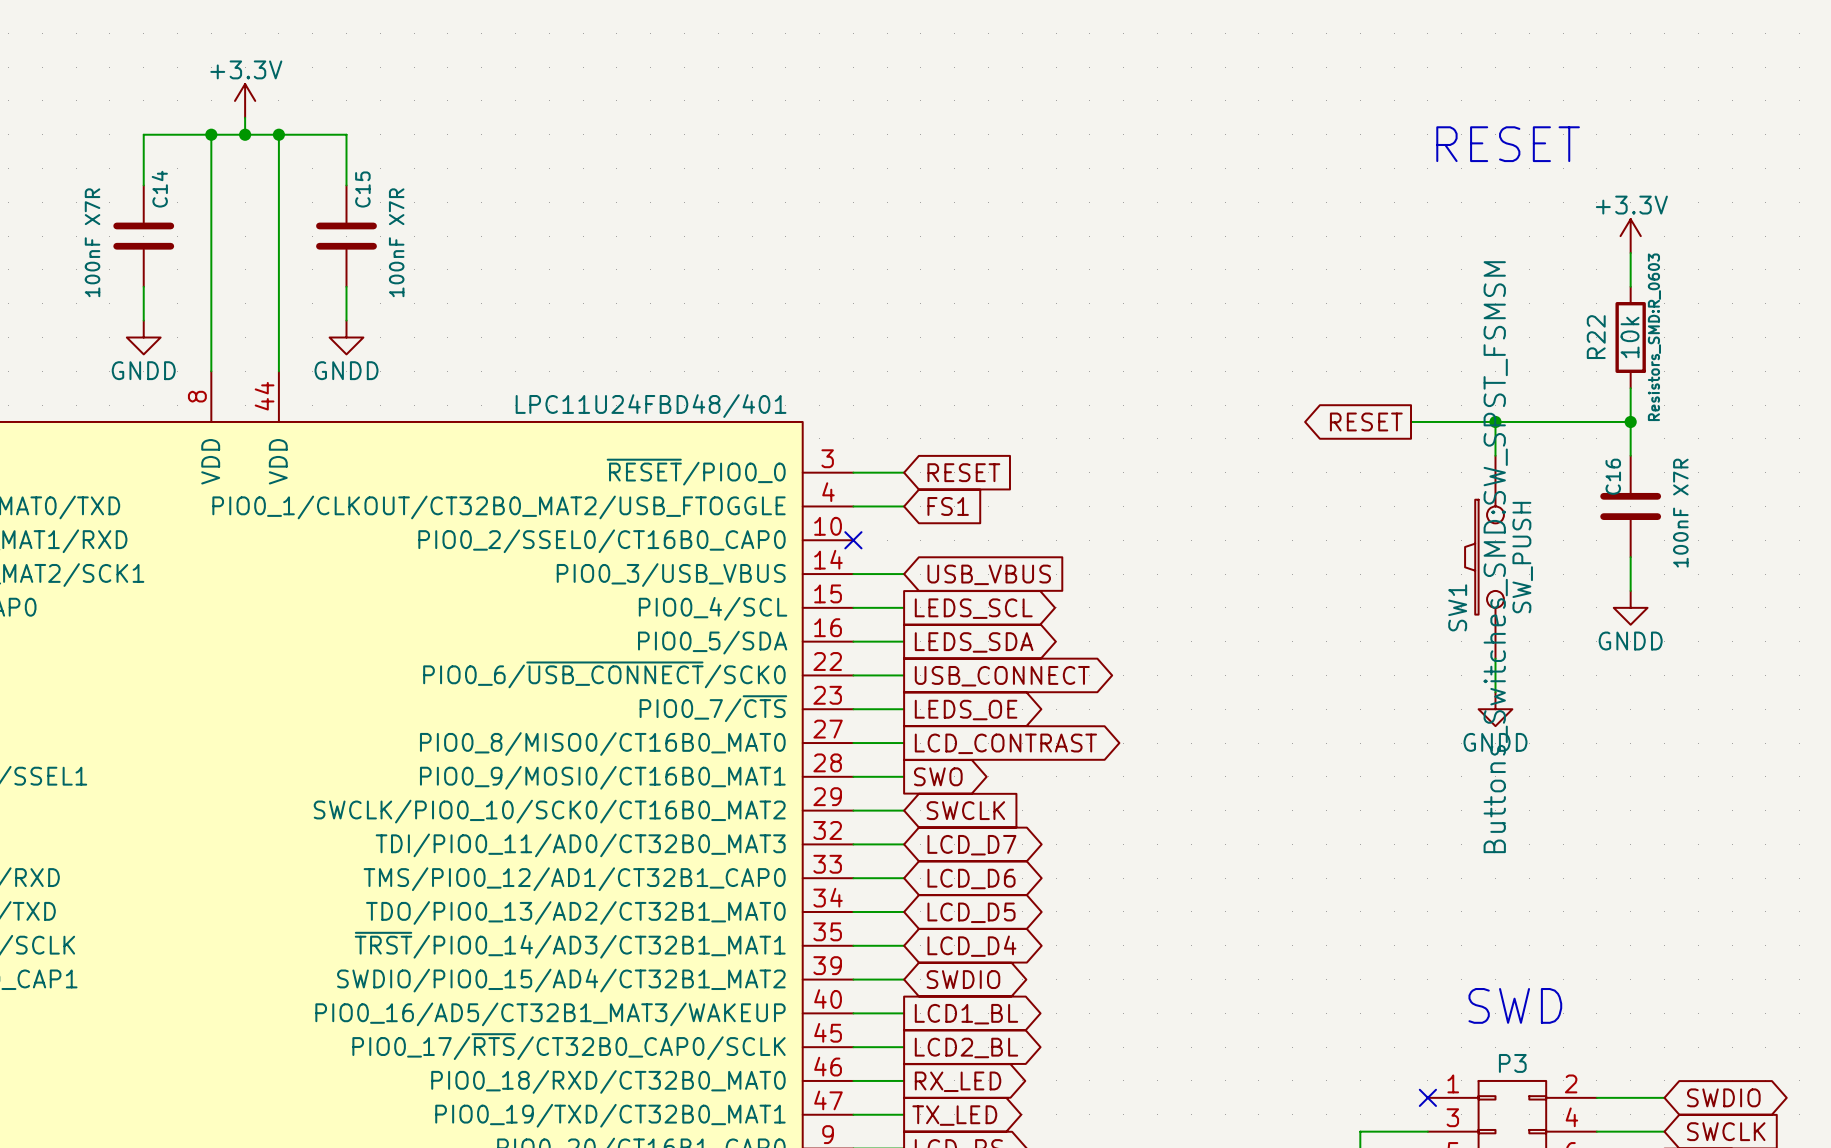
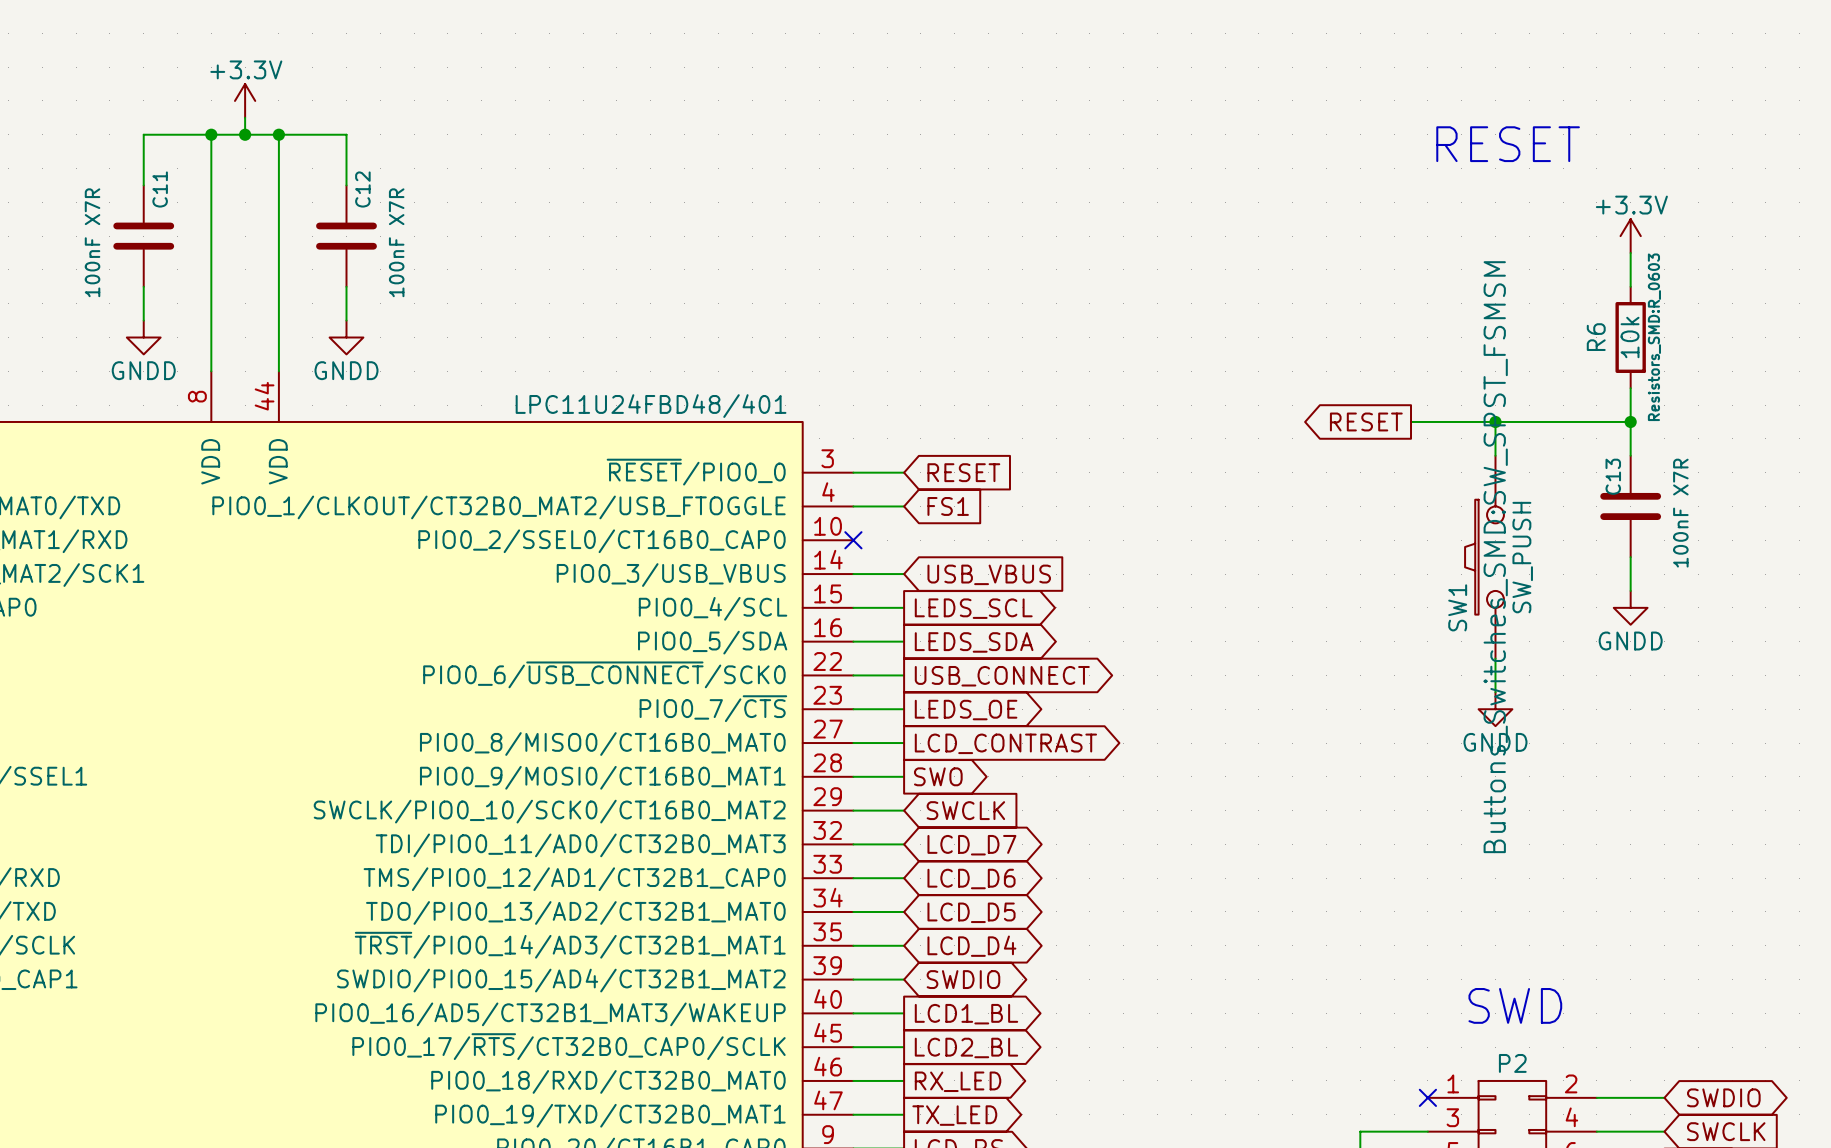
C14 name: C14 (159, 189) -> C11 (160, 189)
C15 name: C15 (362, 189) -> C12 (362, 189)
R22 name: R22 (1596, 337) -> R6 (1596, 337)
C16 name: C16 (1613, 476) -> C13 (1613, 476)
P3 name: P3 (1512, 1063) -> P2 (1512, 1063)

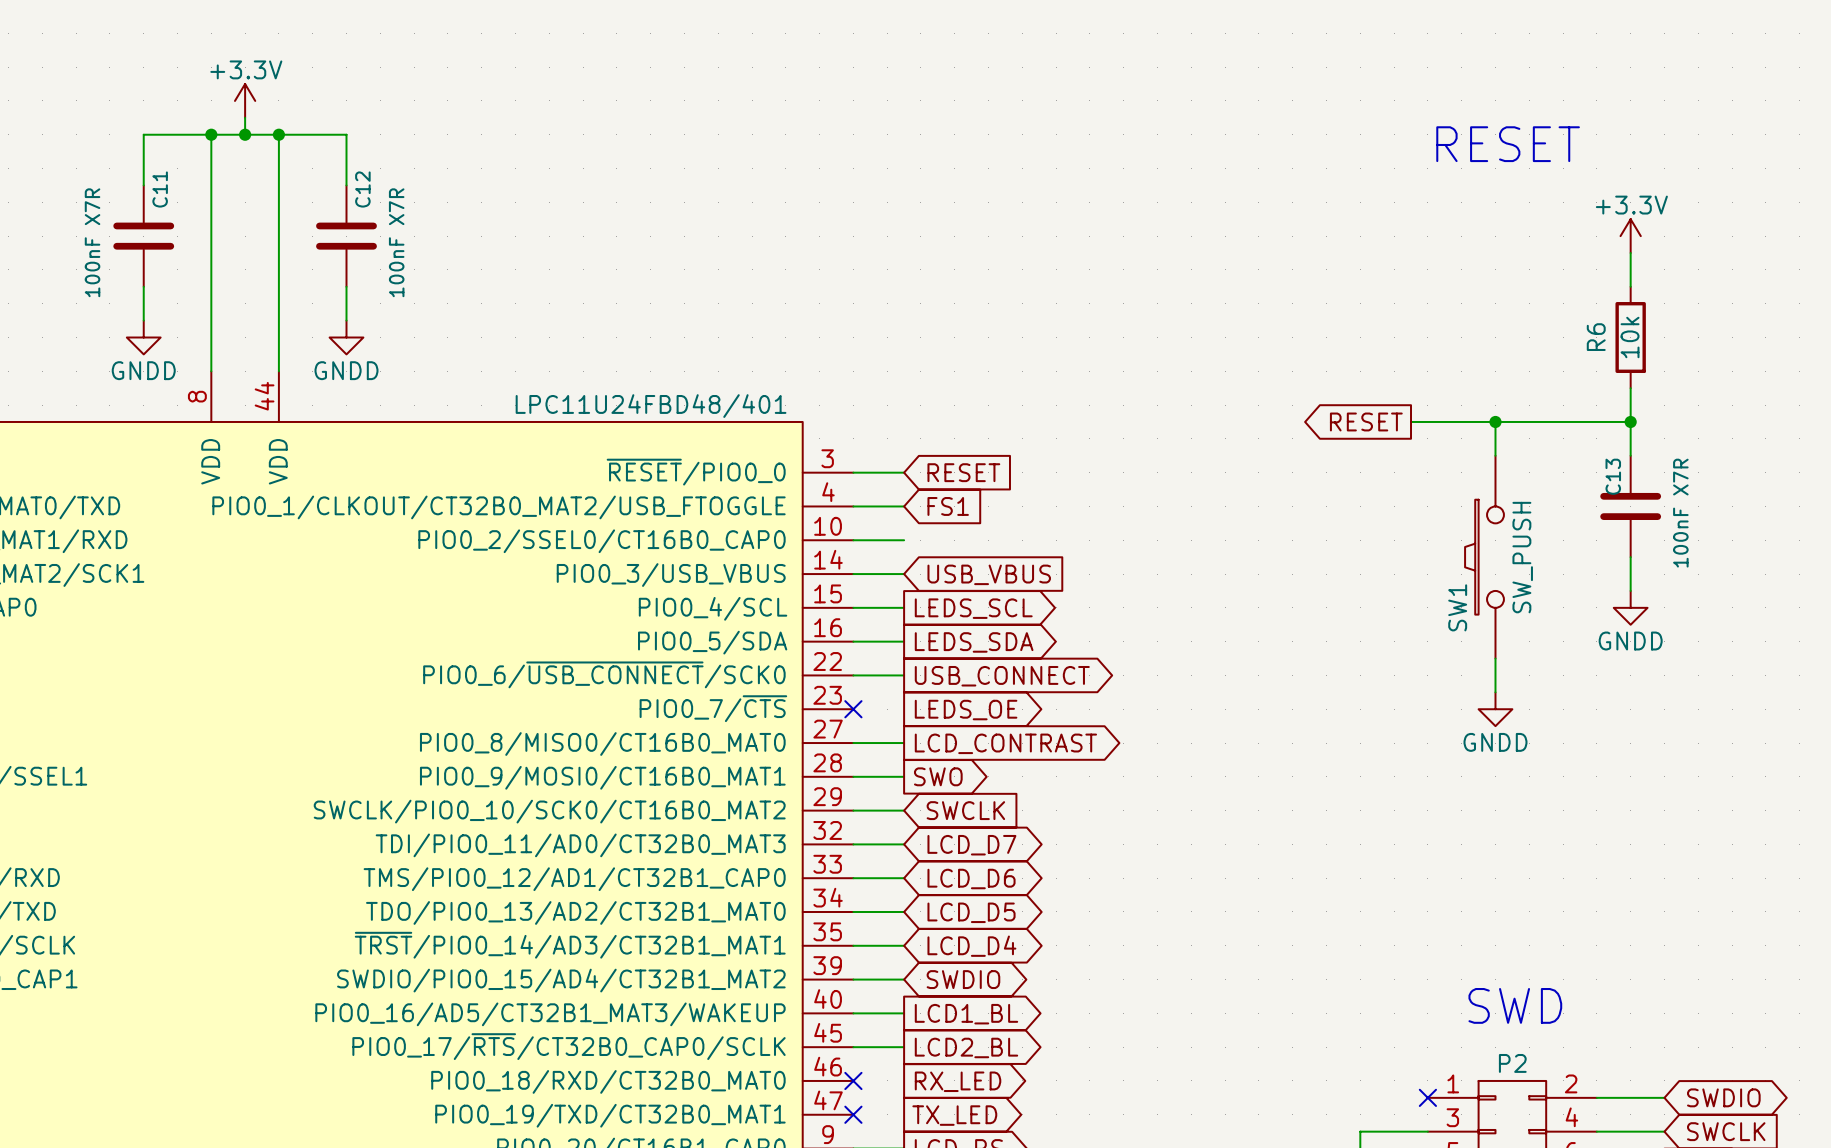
R6 text: Resistors_SMD:R_0603 (1654, 337) -> none
no-connect mark: (853, 540) -> none
SW1 text: Buttons_Switches_SMD:SW_SPST_FSMSM (1495, 557) -> none
wire: (853, 709) (904, 709) -> (853, 540) (904, 540)
no-connect mark: none -> (853, 709)
wire: (853, 1080) (904, 1080) -> none
no-connect mark: none -> (853, 1080)
wire: (853, 1114) (904, 1114) -> none
no-connect mark: none -> (853, 1114)

